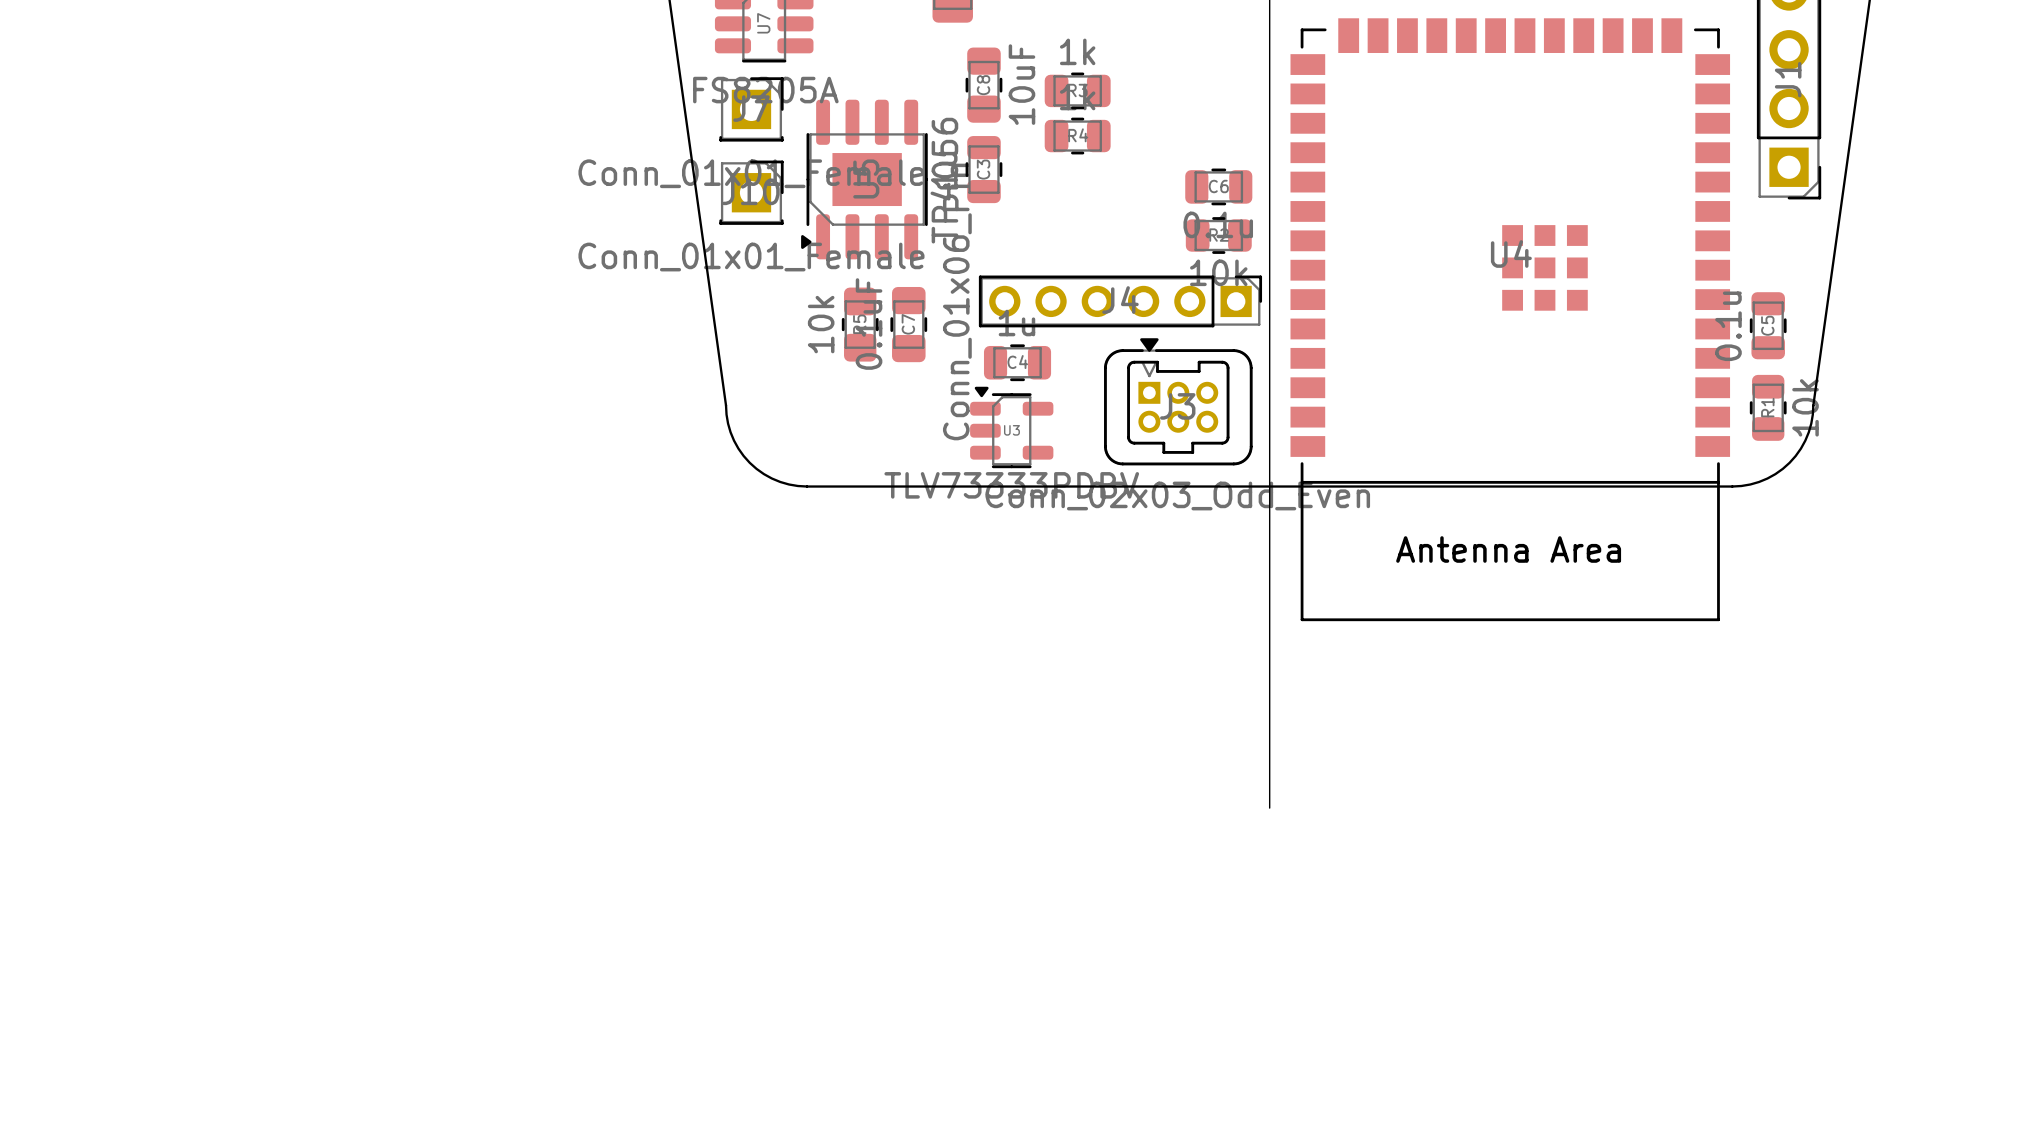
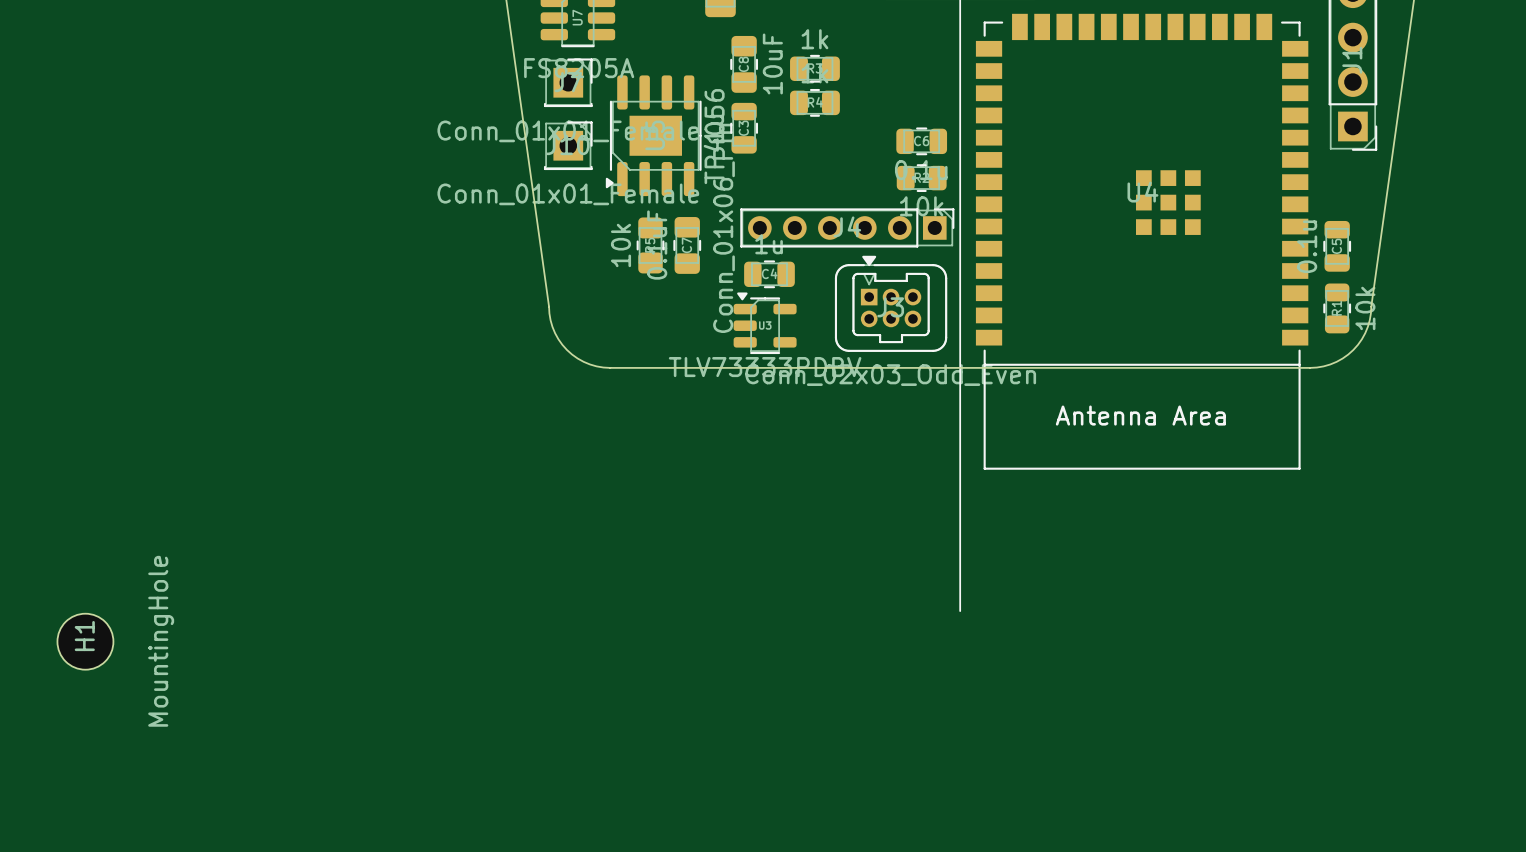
H1: none -> MountingHole (85, 641)

